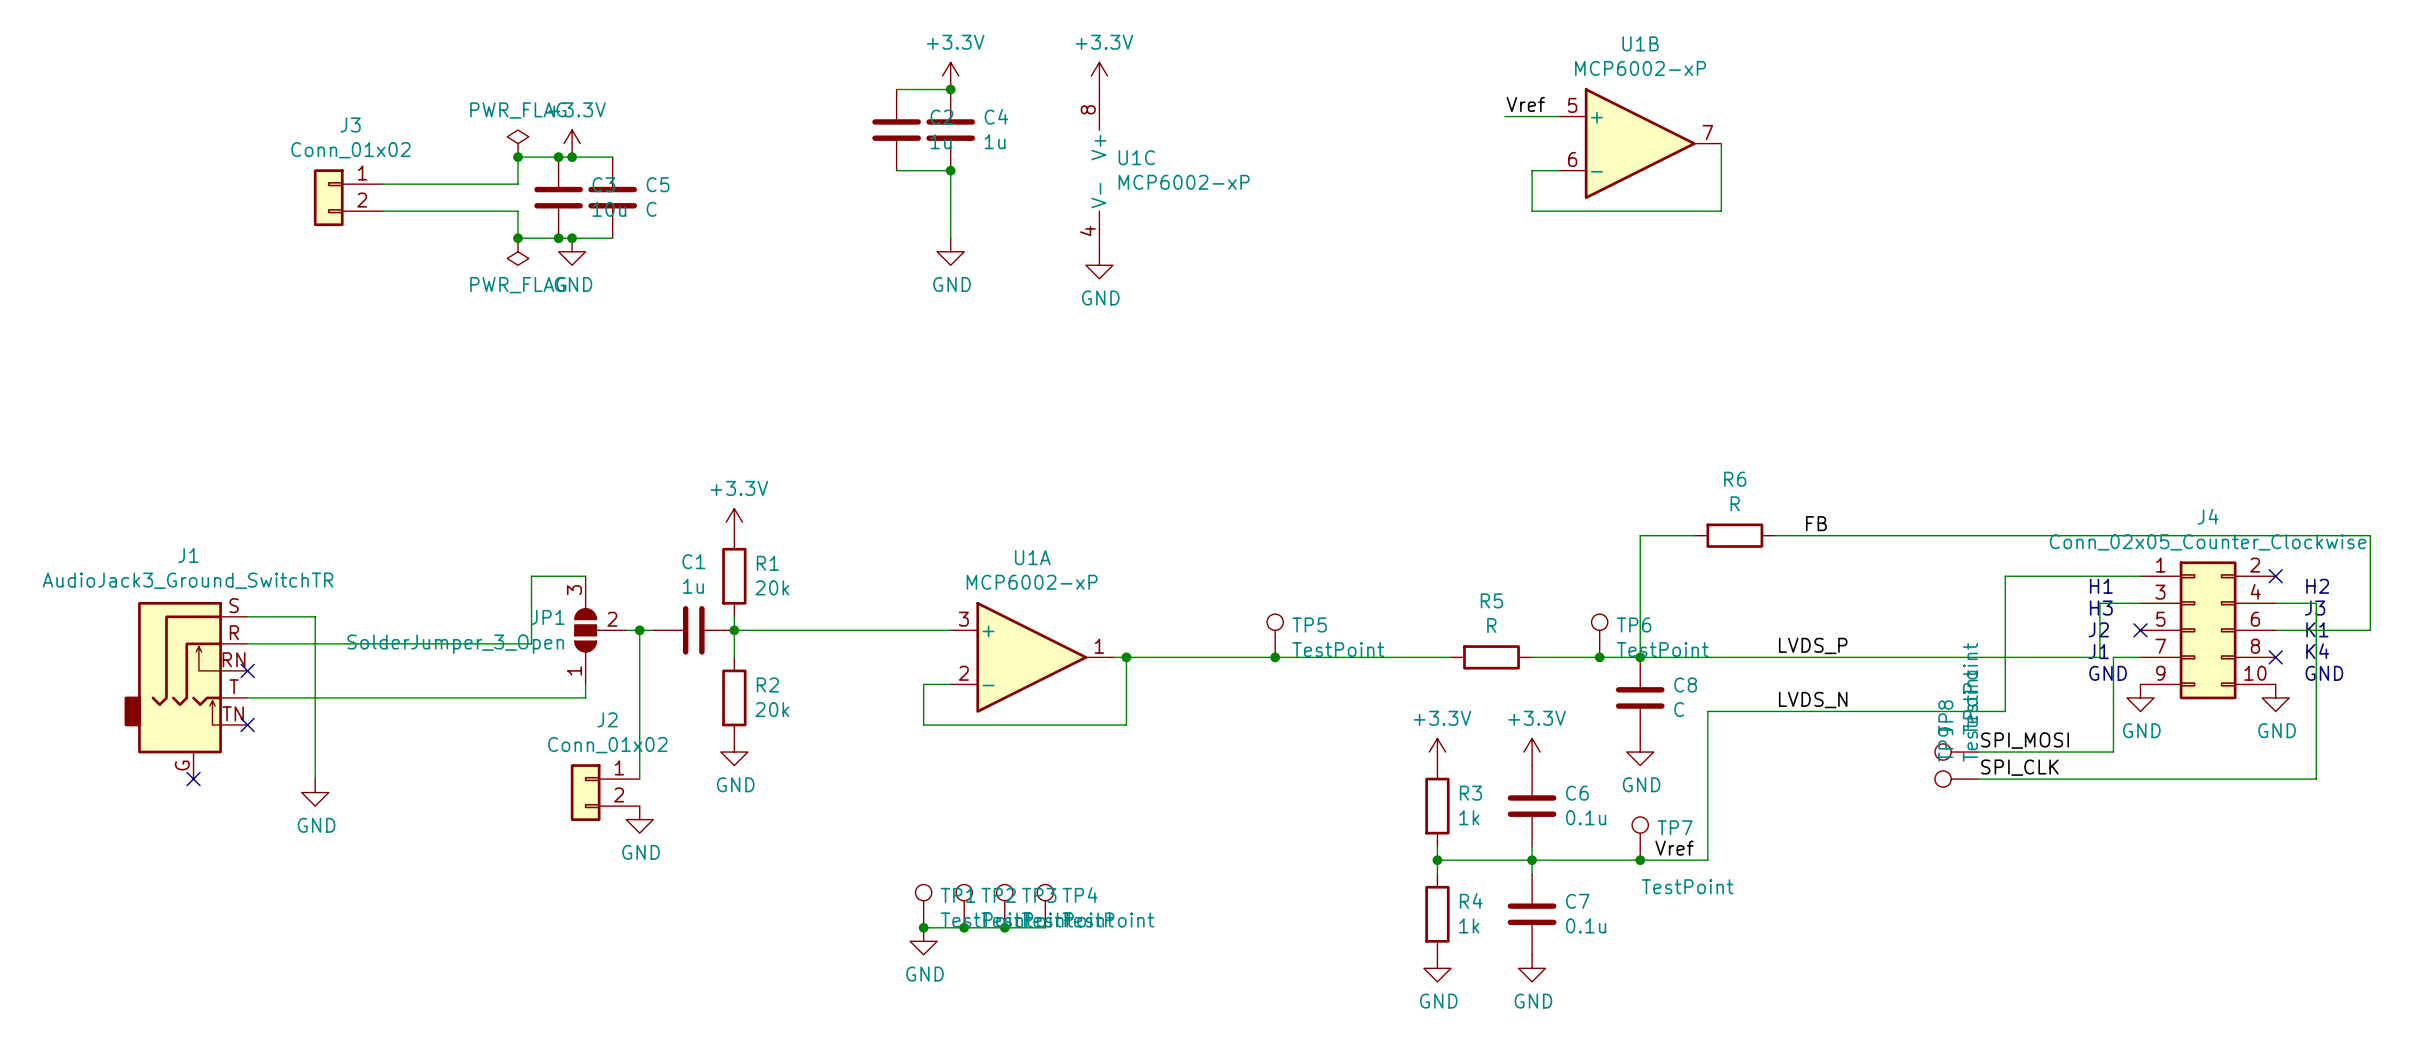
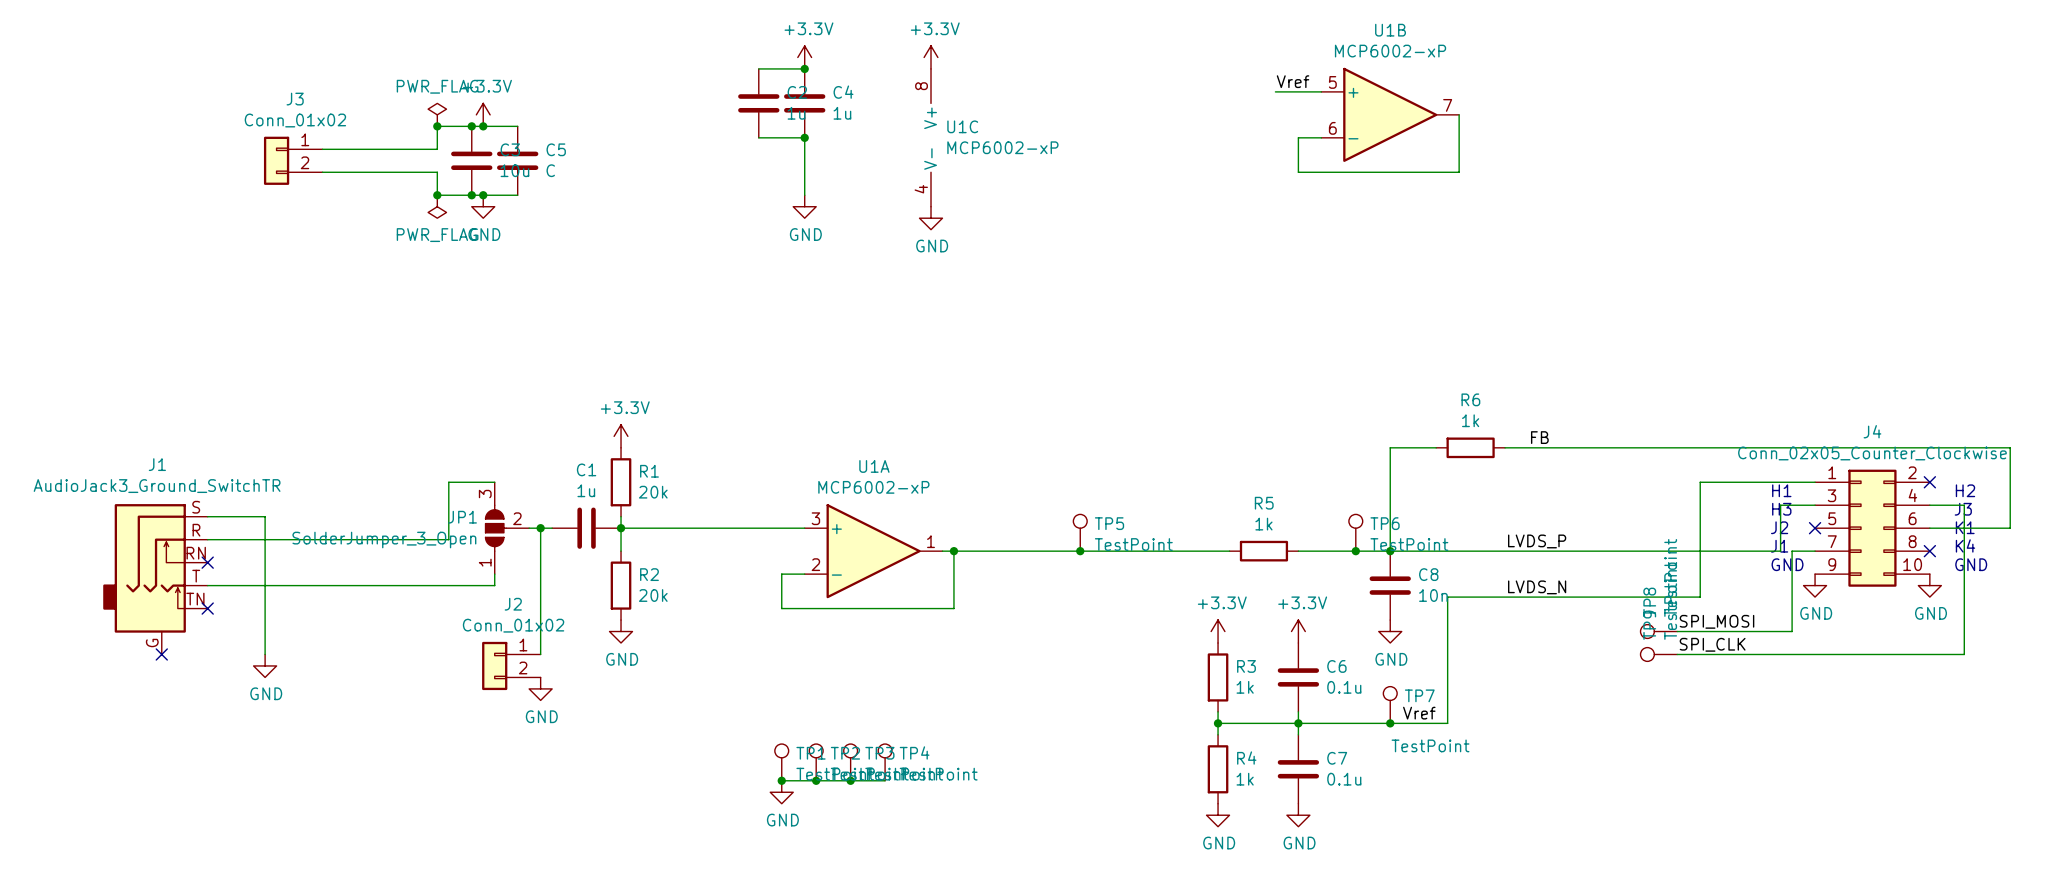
R6 value: R (1735, 503) -> 1k (1470, 420)
R5 value: R (1491, 625) -> 1k (1263, 524)
C8 value: C (1679, 709) -> 10n (1433, 595)

